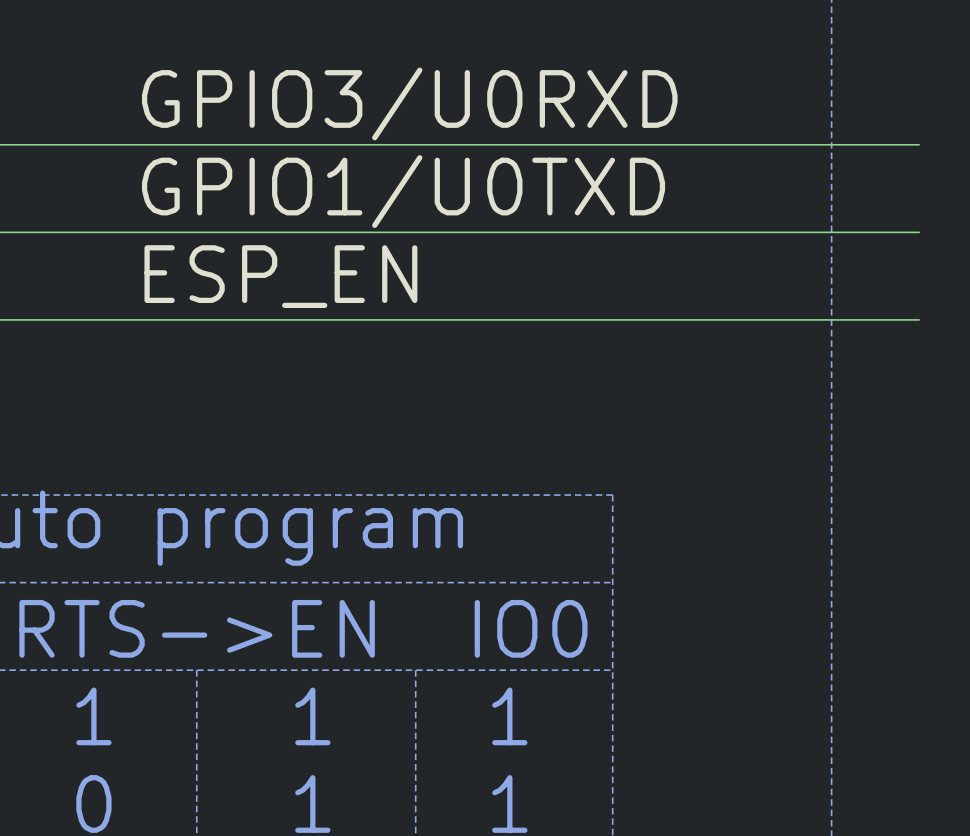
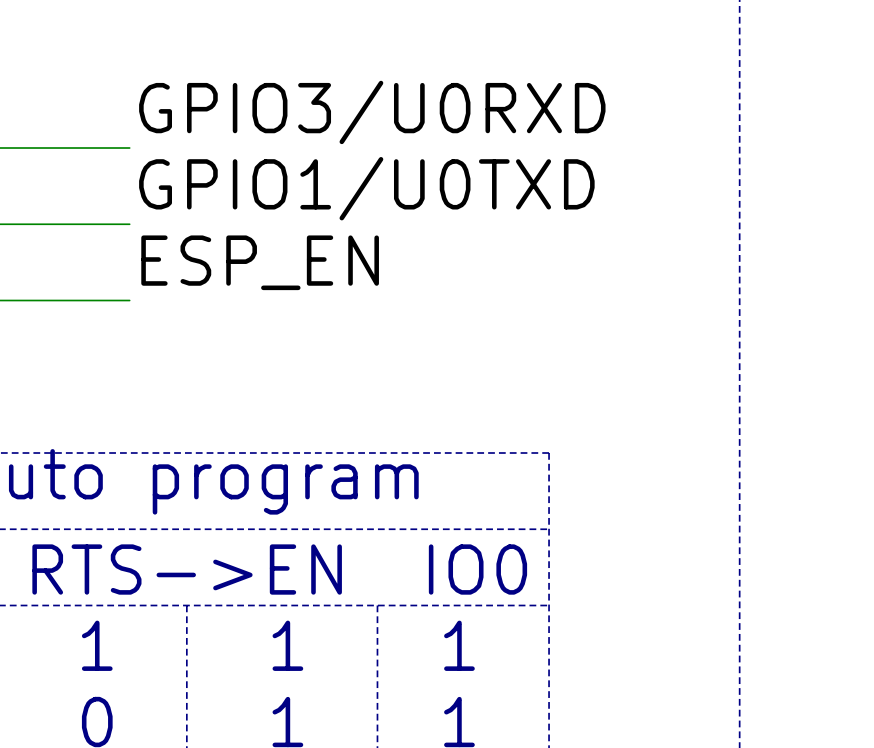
wire: (131, 144) (919, 144) -> none
wire: (131, 232) (919, 232) -> none
wire: (131, 319) (919, 319) -> none

